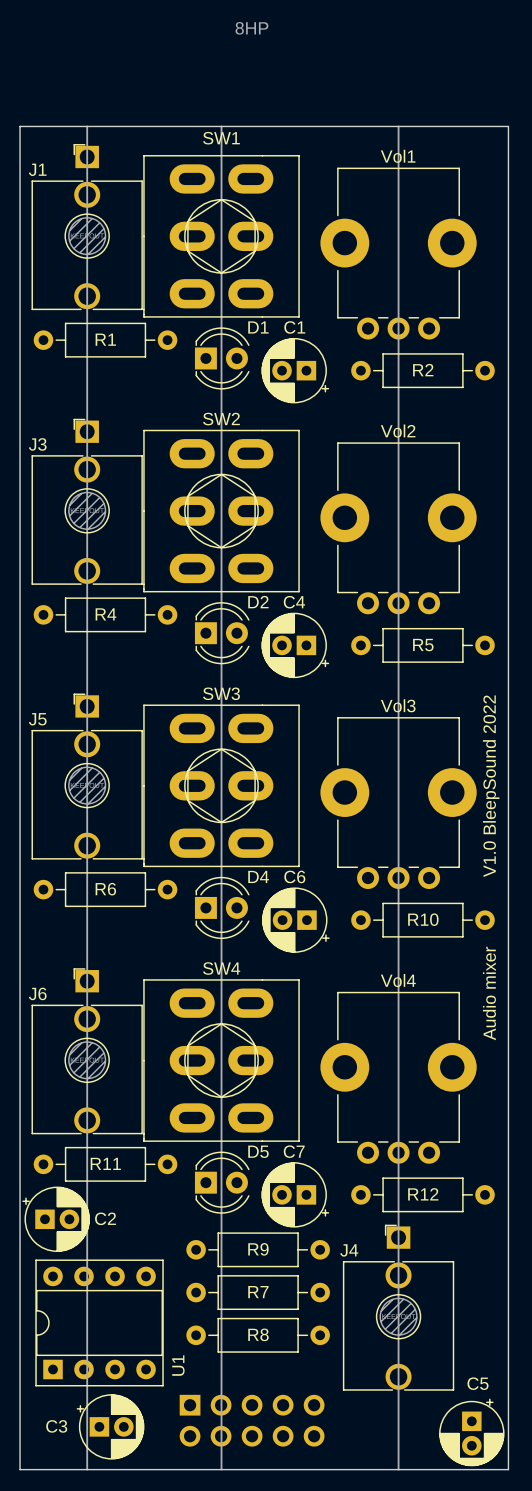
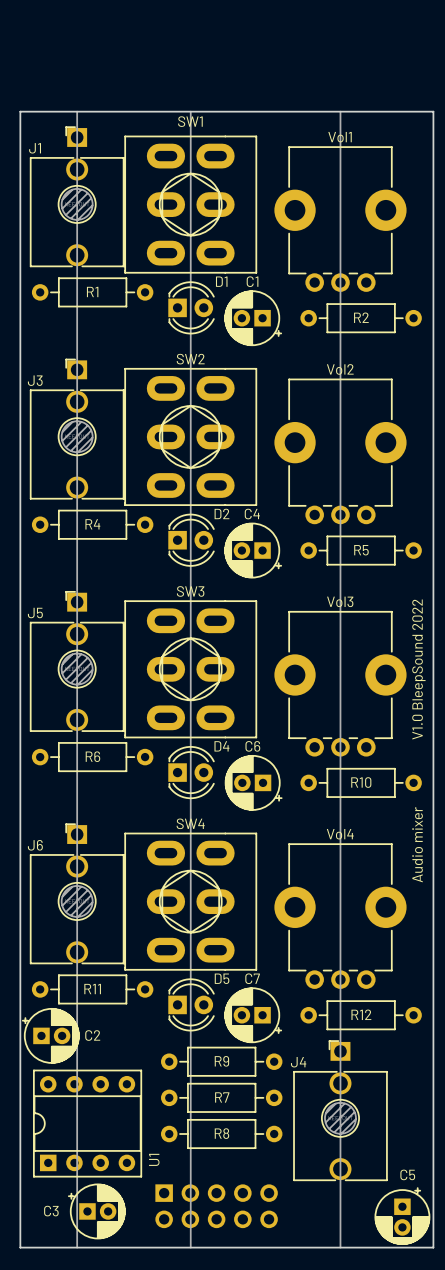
text: 8HP (251, 28) -> none

